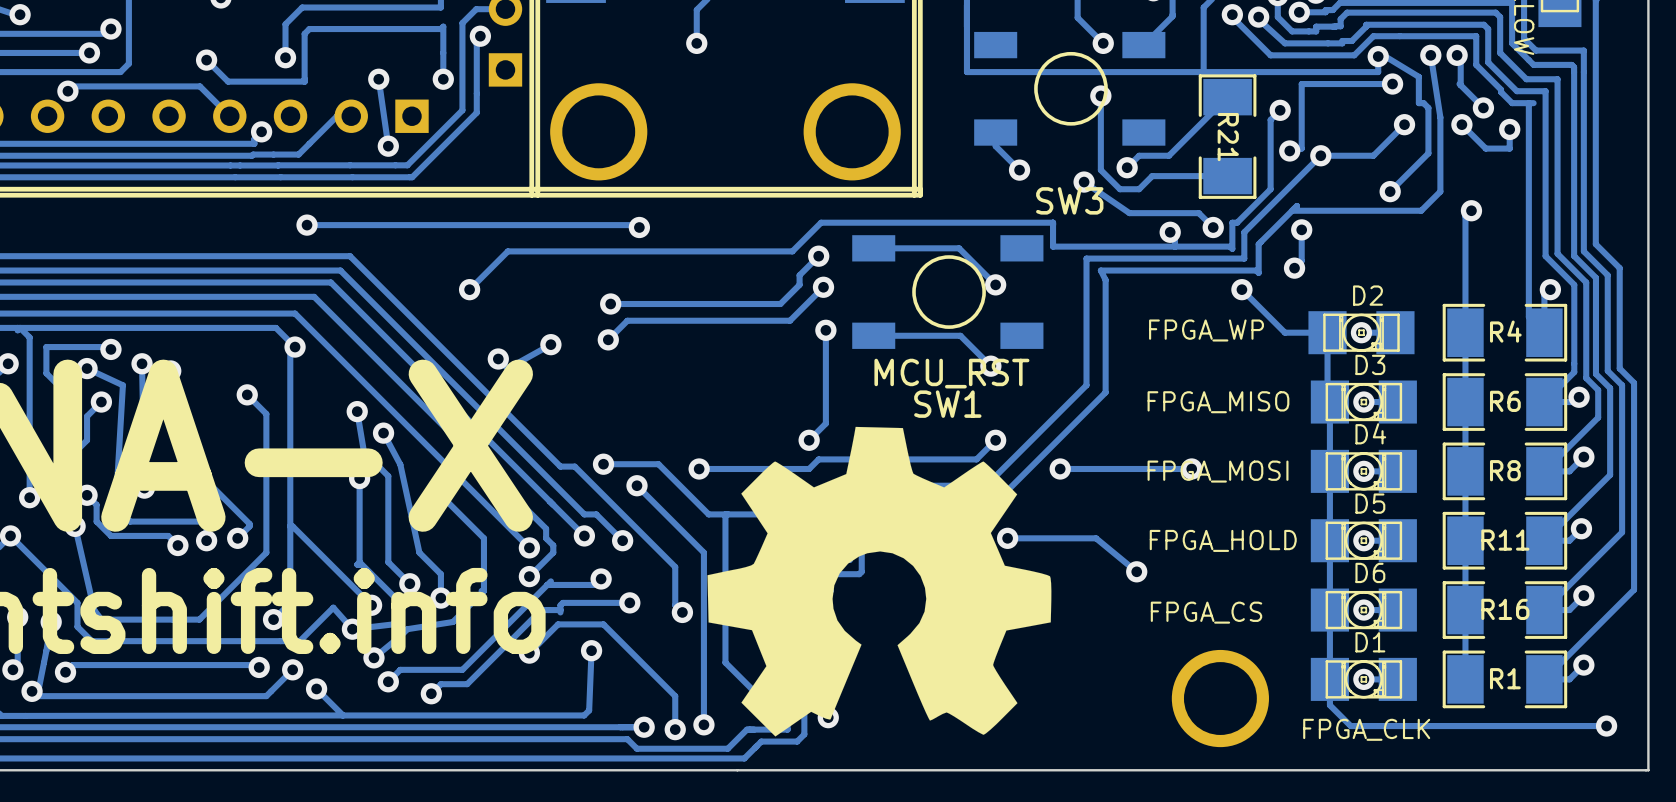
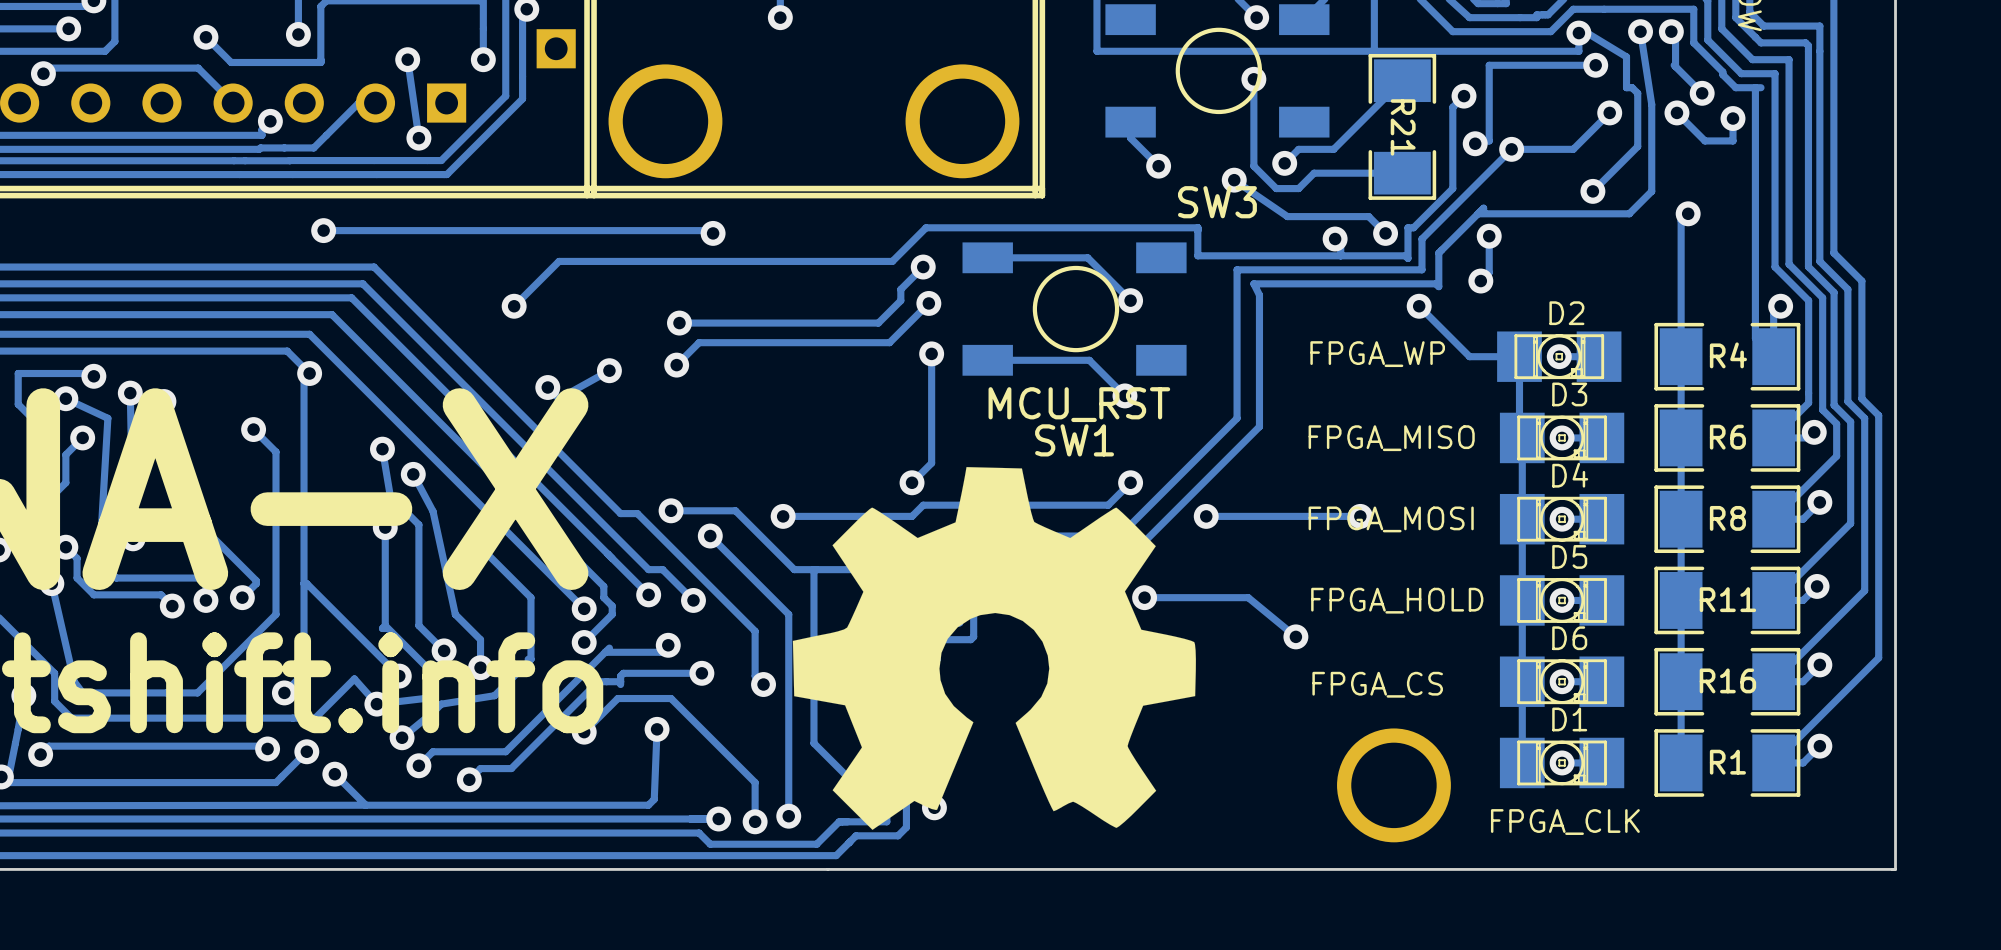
track: (1329, 679) (1329, 705) (1350, 726) (1606, 726) -> none
via: (1606, 726) -> none

